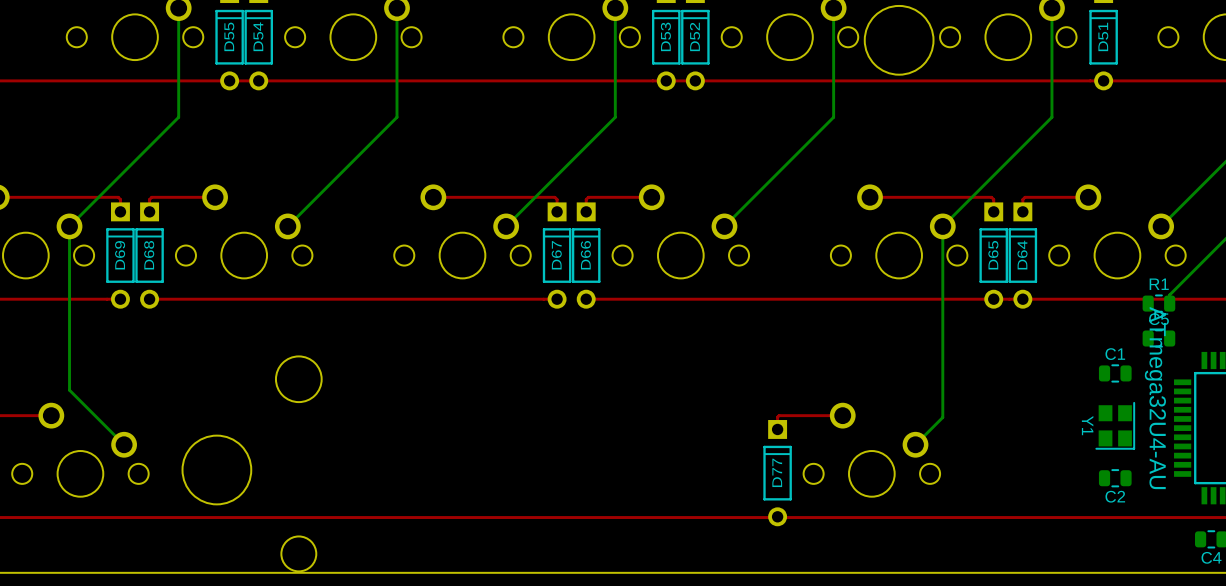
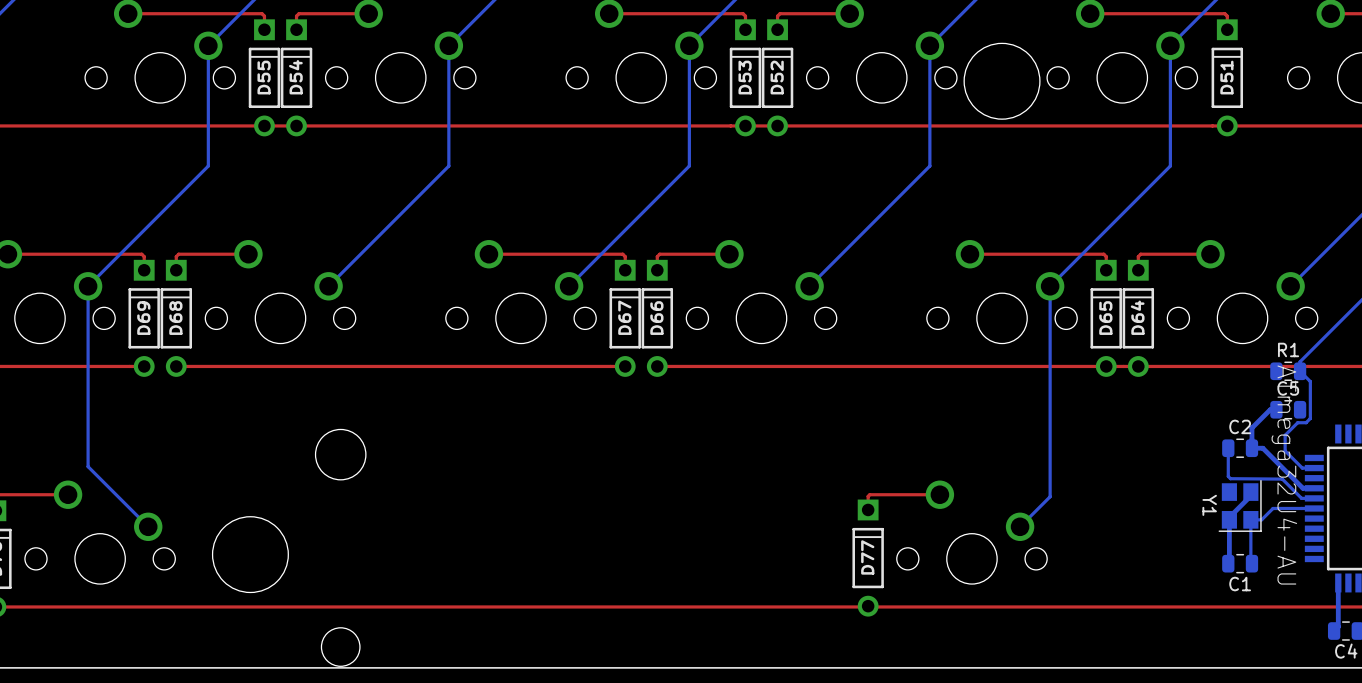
bottom track: none -> (1300, 371) (1310, 381) (1310, 418) (1306, 422) (1297, 422) (1285, 435) (1285, 450) (1302, 468) (1314, 468)
bottom track: none -> (1276, 409) (1270, 409) (1251, 428) (1251, 448)
C1 name: C1 (1115, 354) -> C2 (1240, 426)
bottom track: none -> (1228, 448) (1228, 476) (1230, 478) (1282, 479) (1301, 498) (1314, 498)
bottom track: none -> (1251, 448) (1262, 448) (1302, 488) (1314, 488)
bottom track: none -> (1250, 492) (1250, 495) (1229, 517) (1228, 563)
bottom track: none -> (1314, 508) (1273, 508) (1261, 519) (1250, 519) (1251, 563)
bottom track: none -> (1338, 582) (1338, 626) (1334, 631)
C2 name: C2 (1115, 496) -> C1 (1240, 584)

